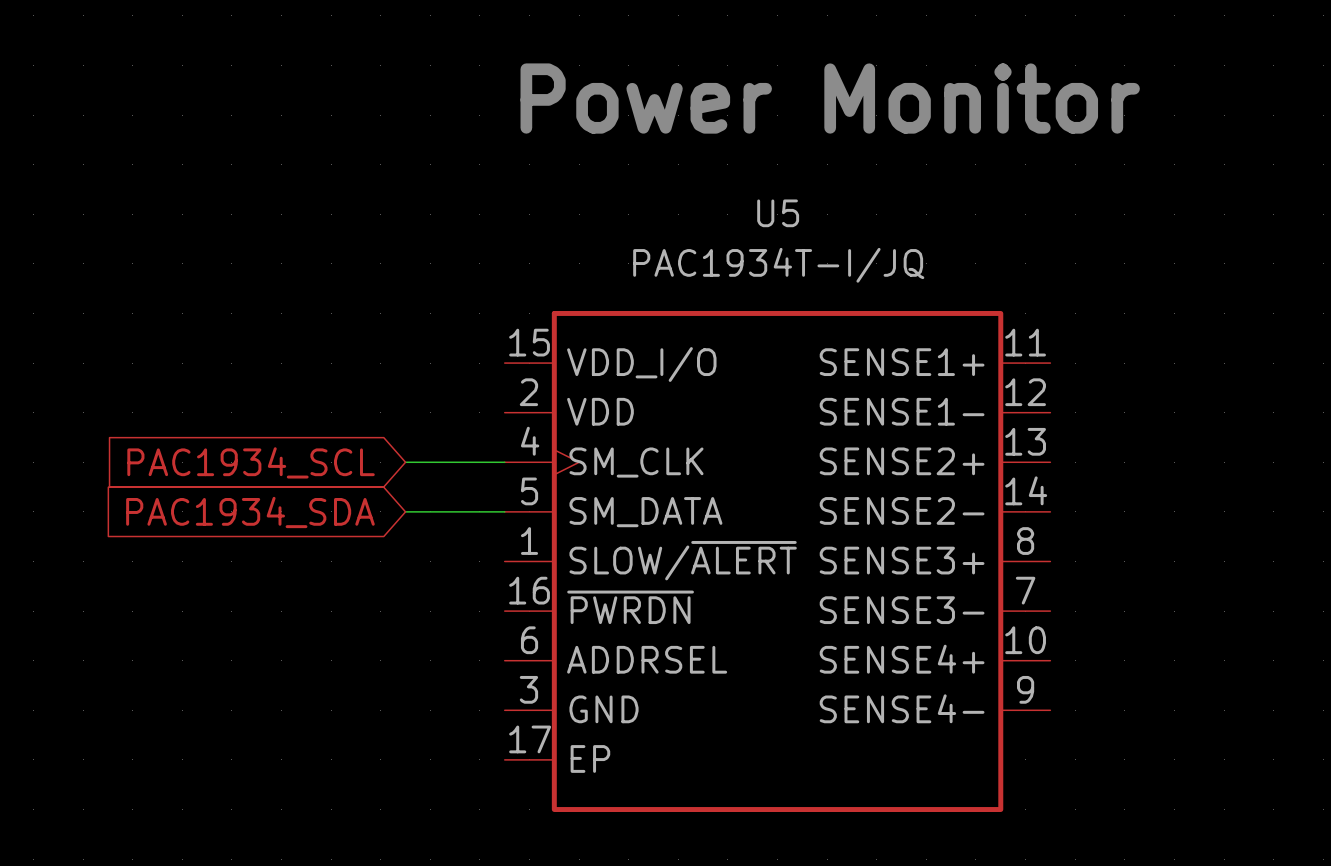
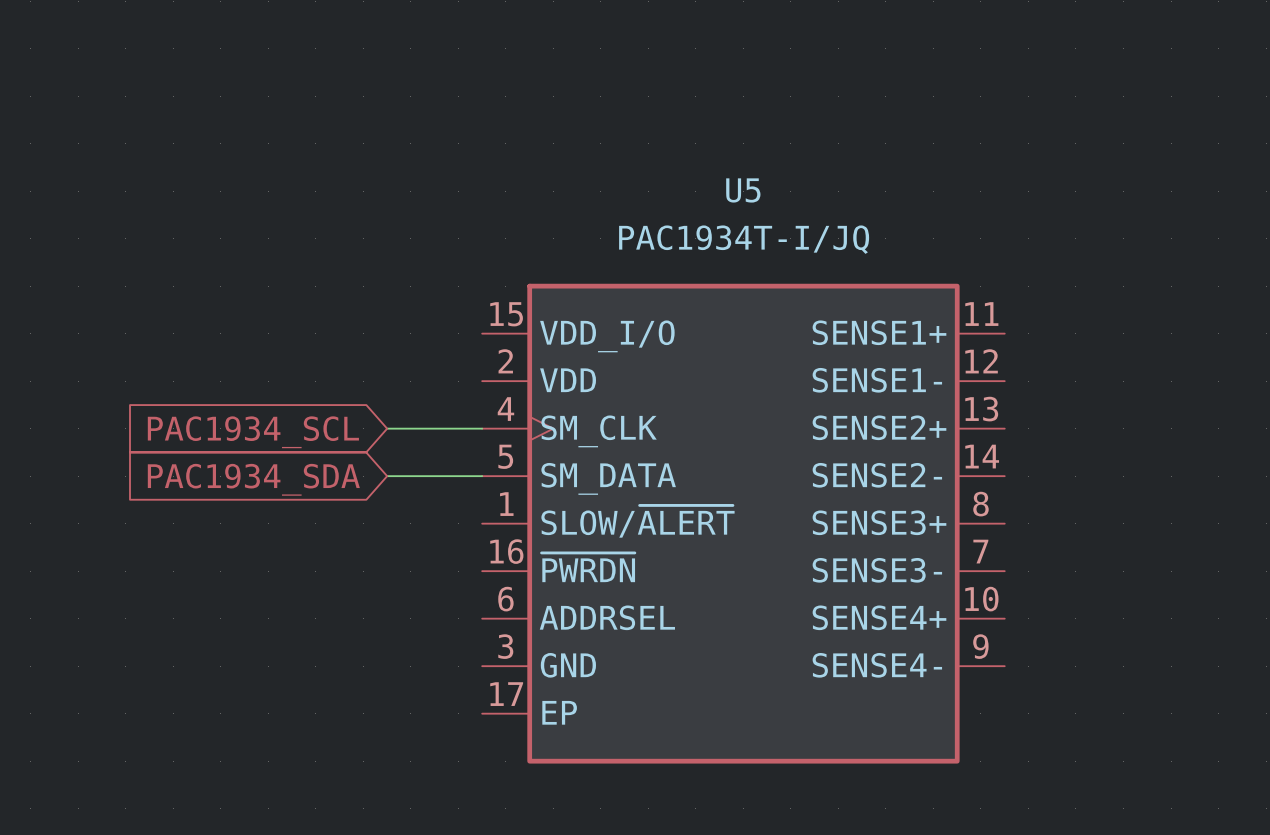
text: Power Monitor (830, 98) -> none

